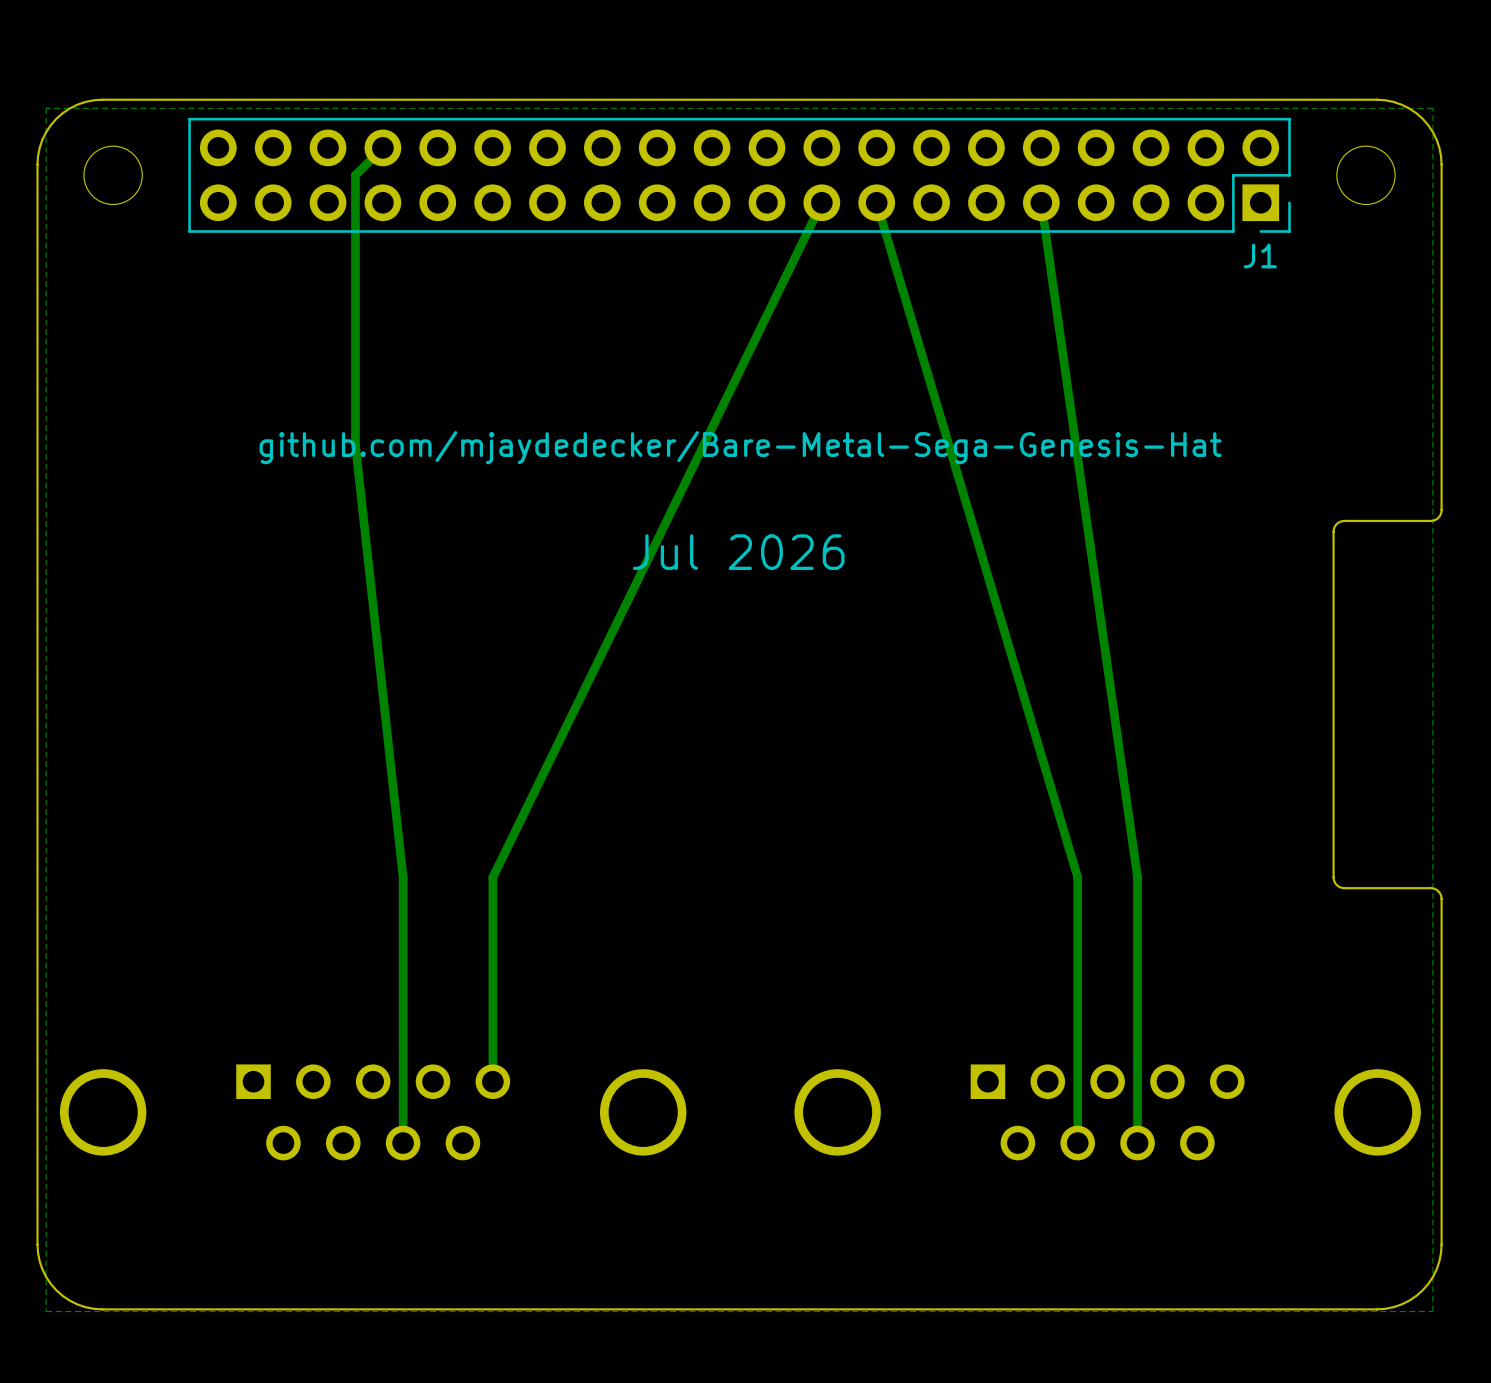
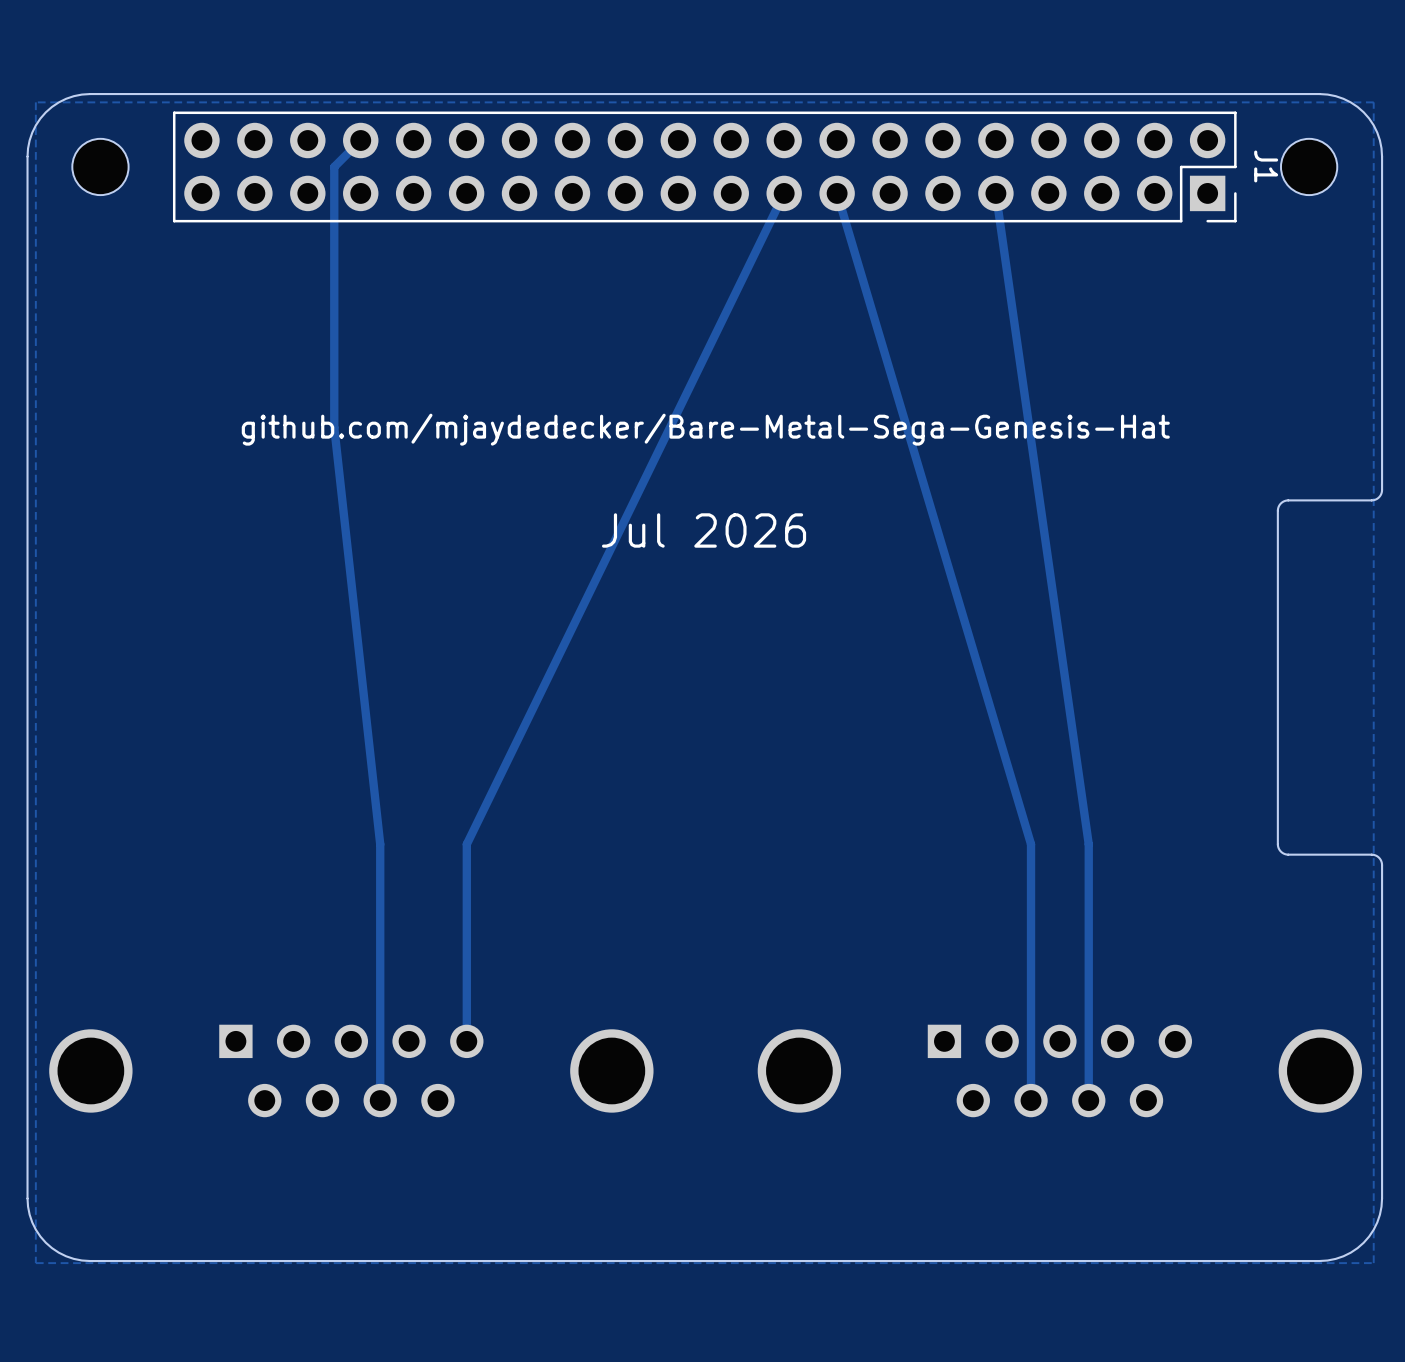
J1 name rotation: 0° (1260, 255) -> 90° clockwise (1266, 166)
J1 name position: J1 (1260, 255) -> J1 (1266, 166)

